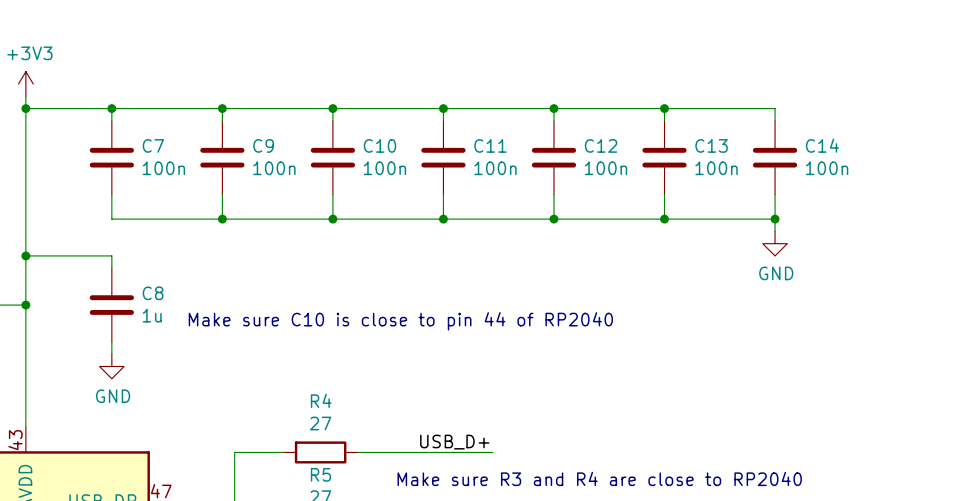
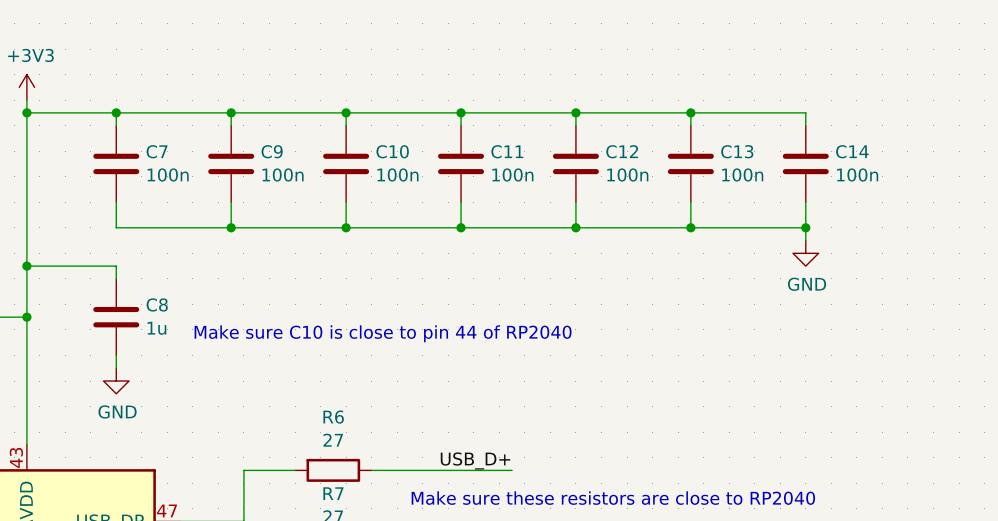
R4 name: R4 (321, 400) -> R6 (333, 417)
R5 name: R5 (320, 474) -> R7 (333, 493)
text: Make sure R3 and R4 are close to RP2040 (599, 478) -> Make sure these resistors are close to RP2040 (613, 498)

